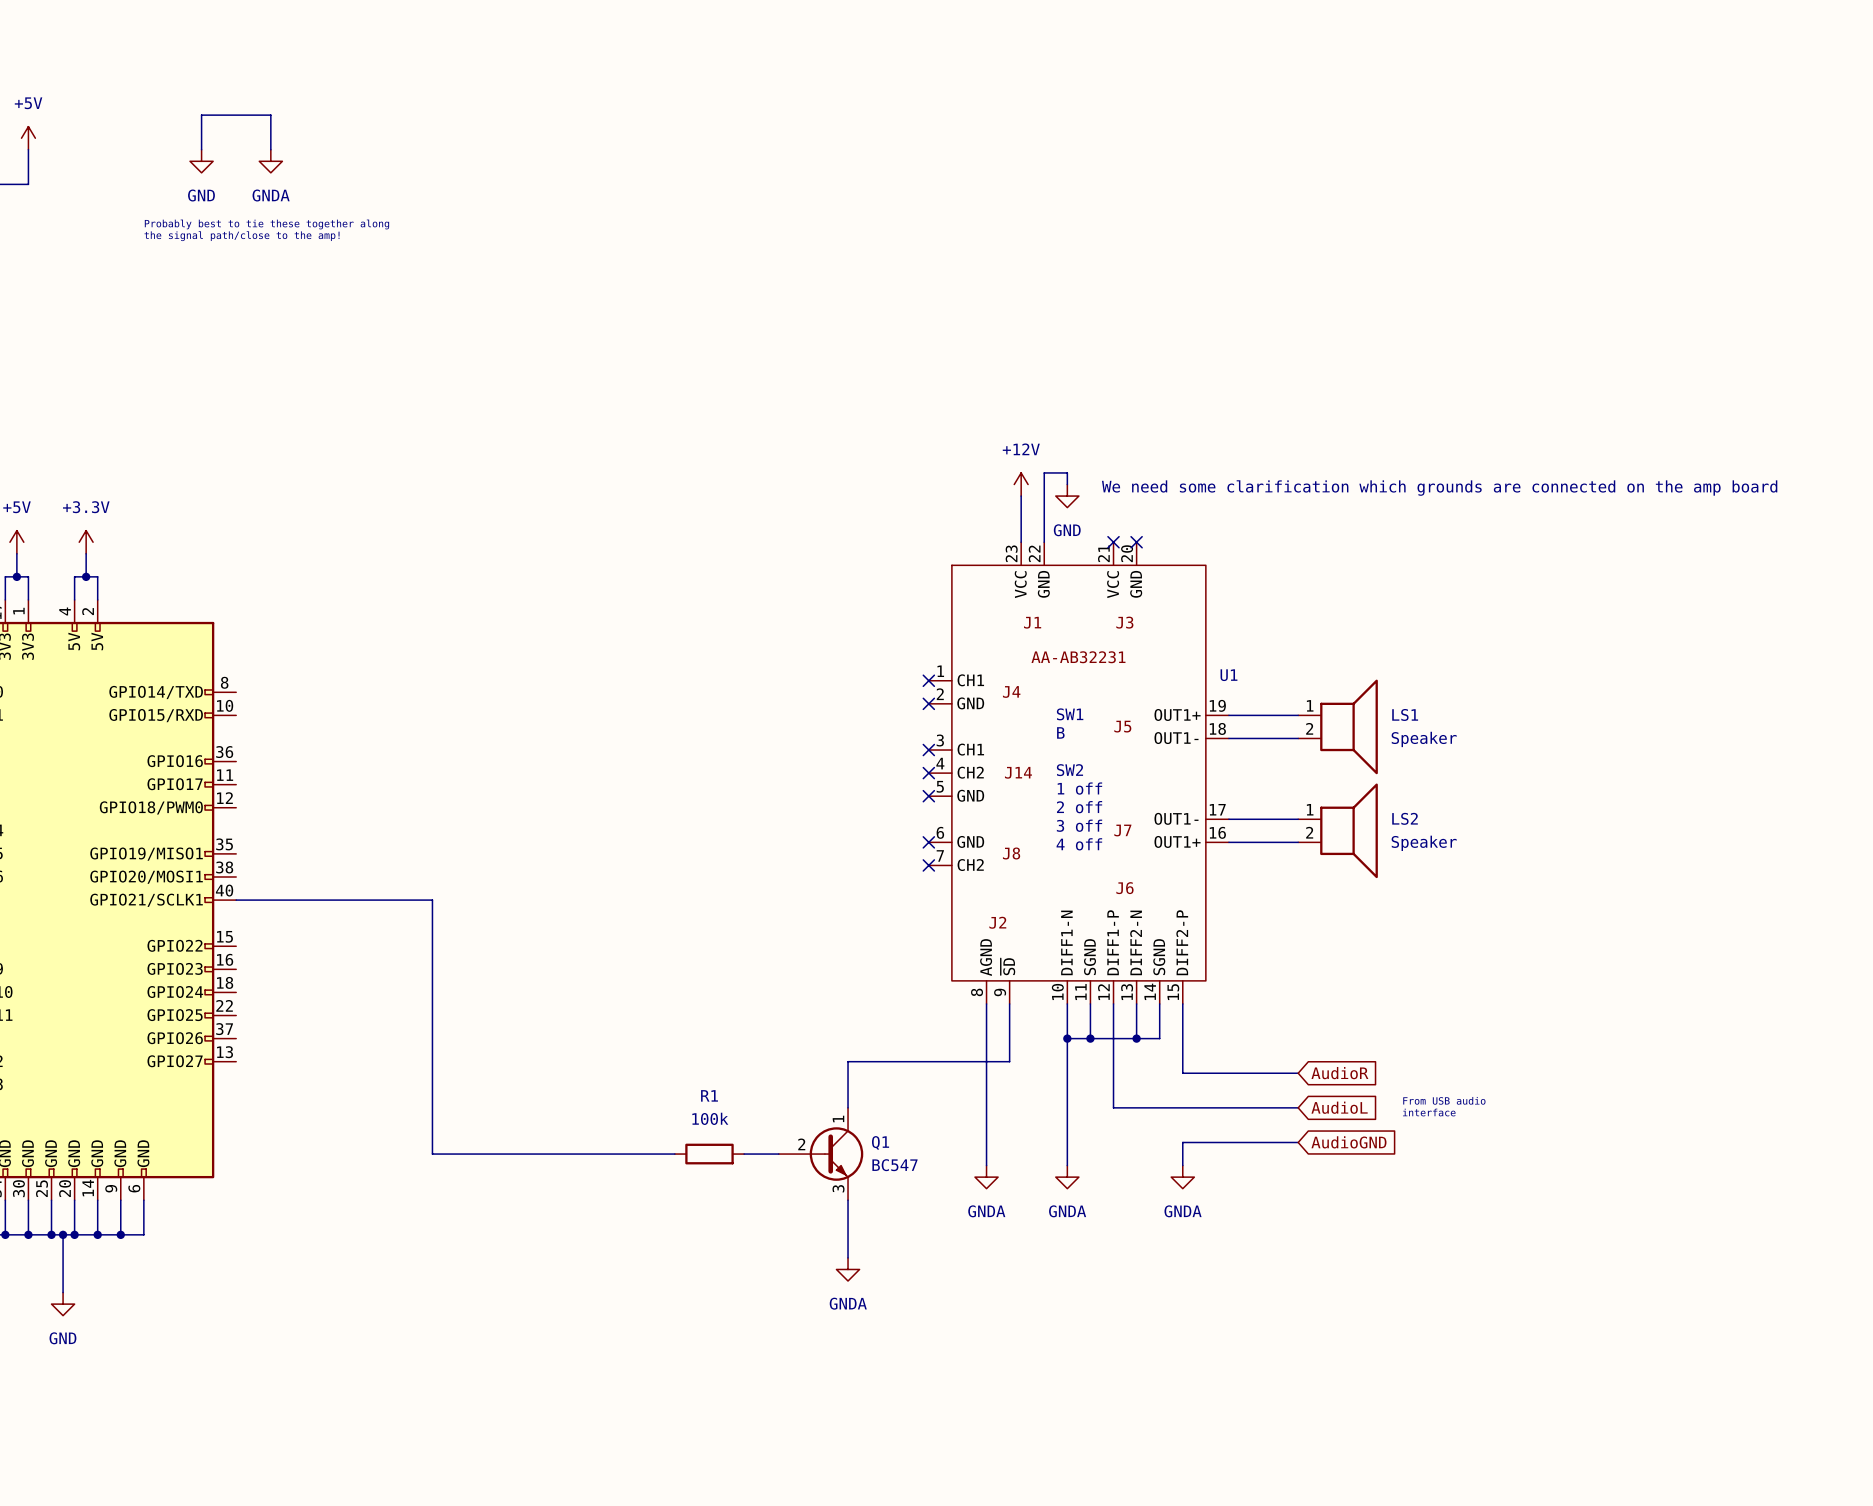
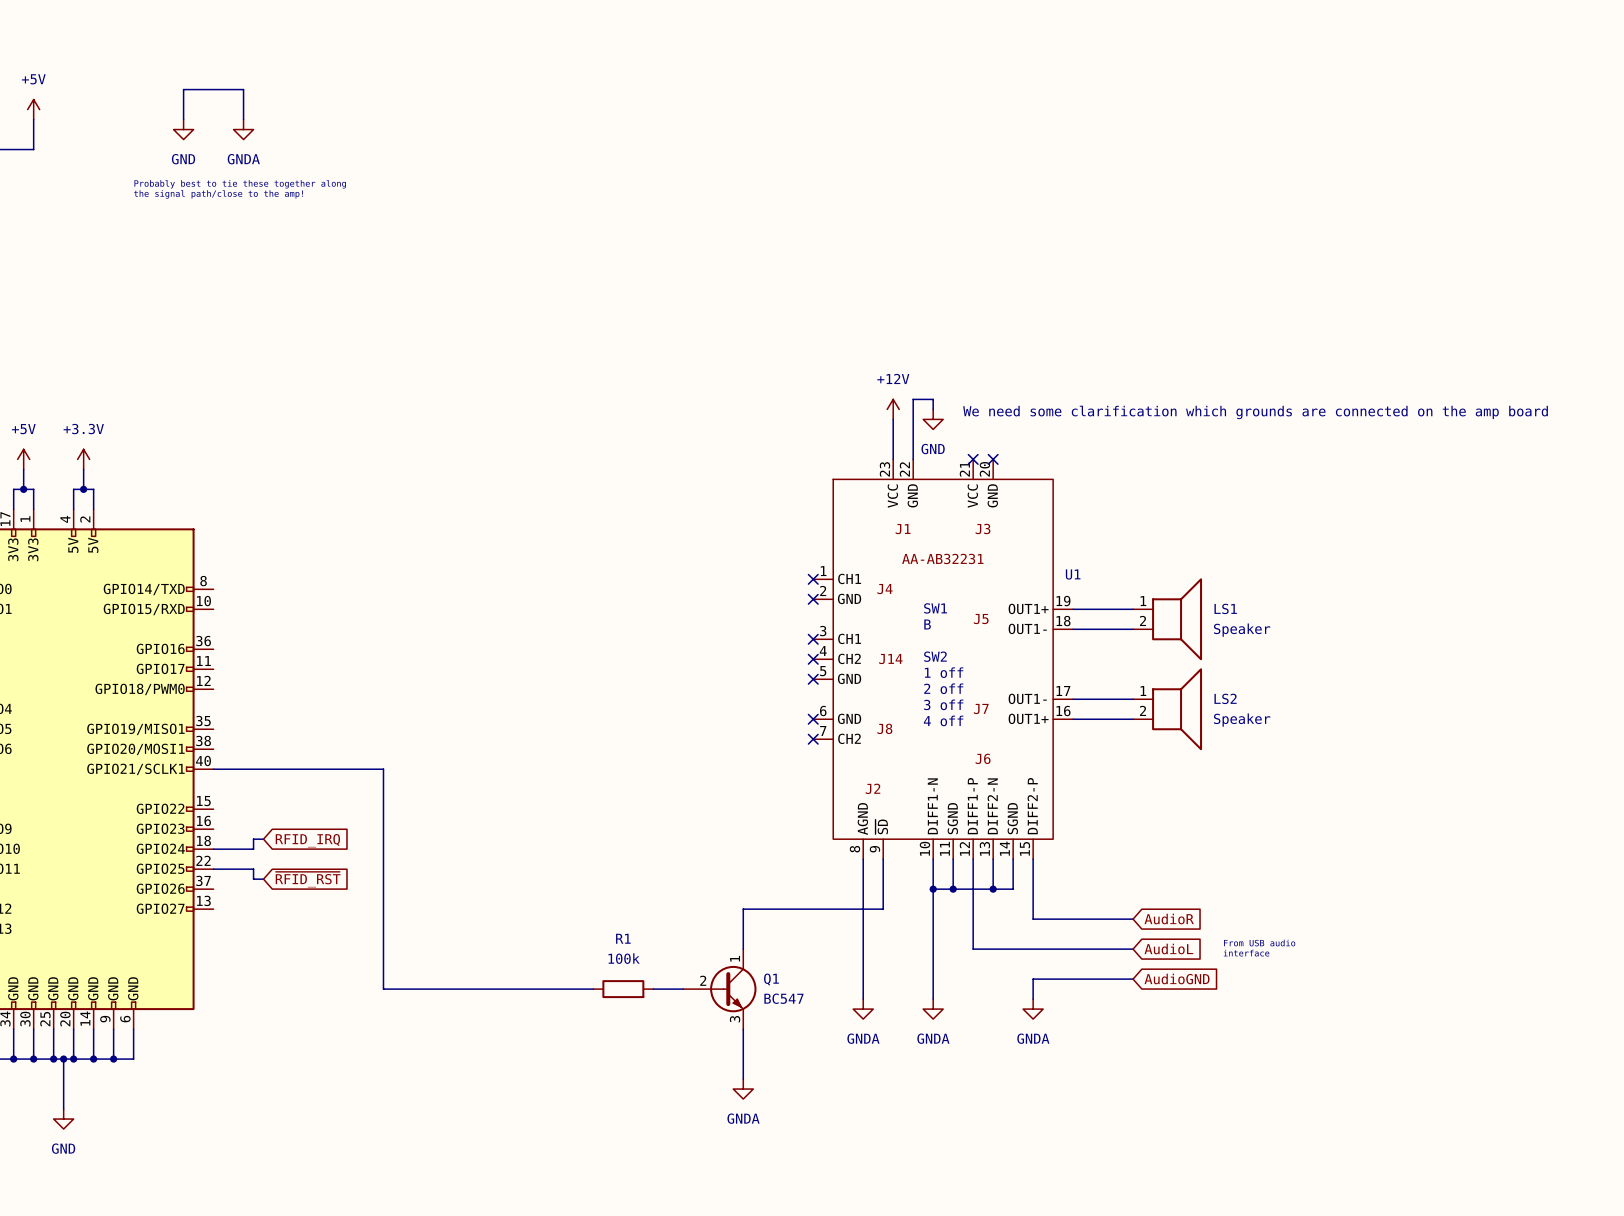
wire: none -> (263, 839) (253, 839) (253, 849) (213, 849)
global label: none -> RFID_IRQ (307, 840)
wire: none -> (213, 869) (253, 869) (253, 879) (263, 879)
global label: none -> ~{RFID_RST} (308, 879)

